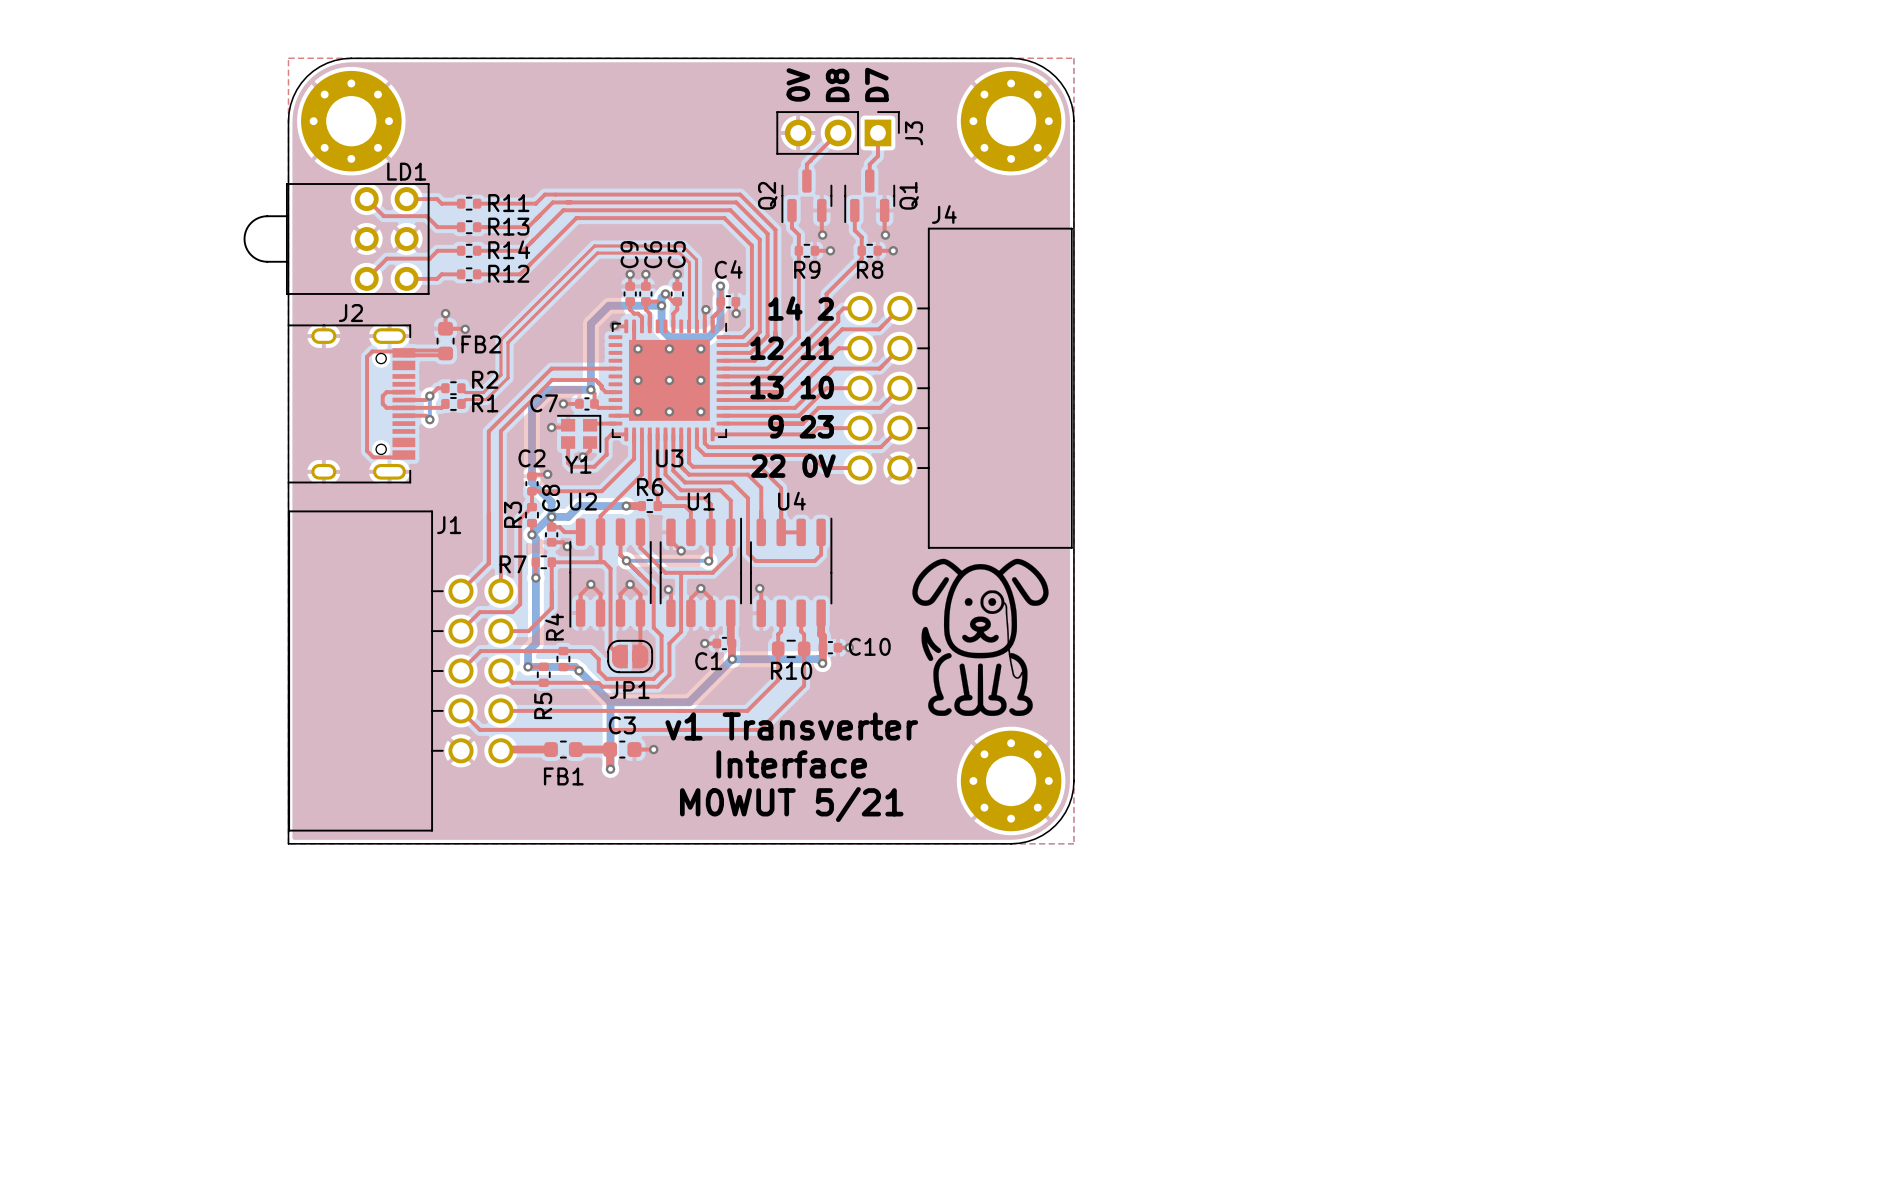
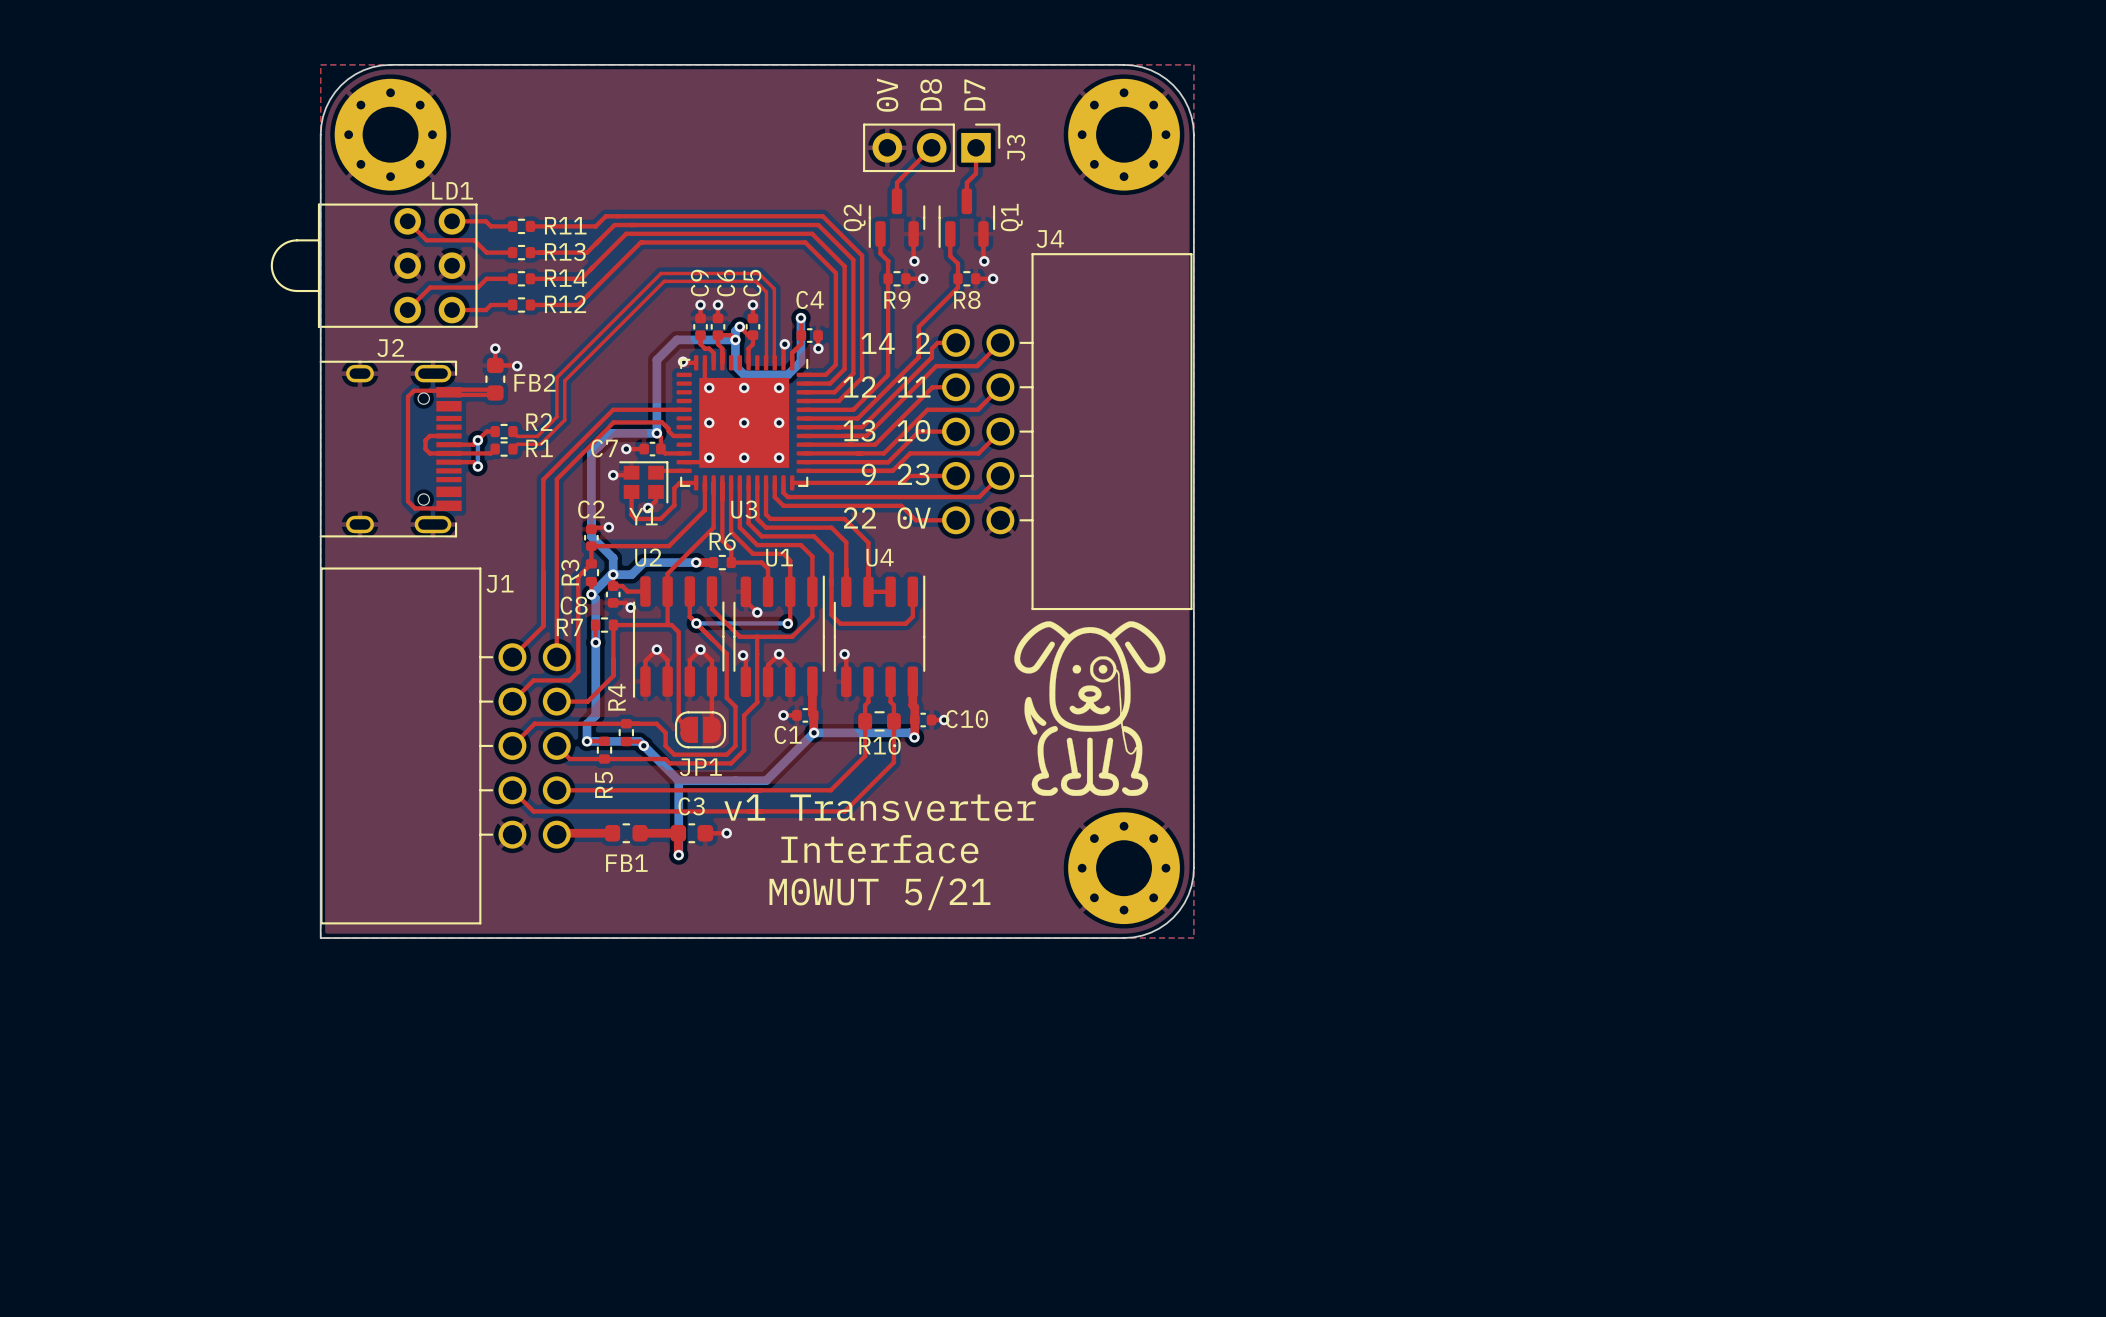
C8 name rotation: 0° (551, 498) -> 90° clockwise (574, 605)
C8 name position: C8 (551, 498) -> C8 (574, 605)

